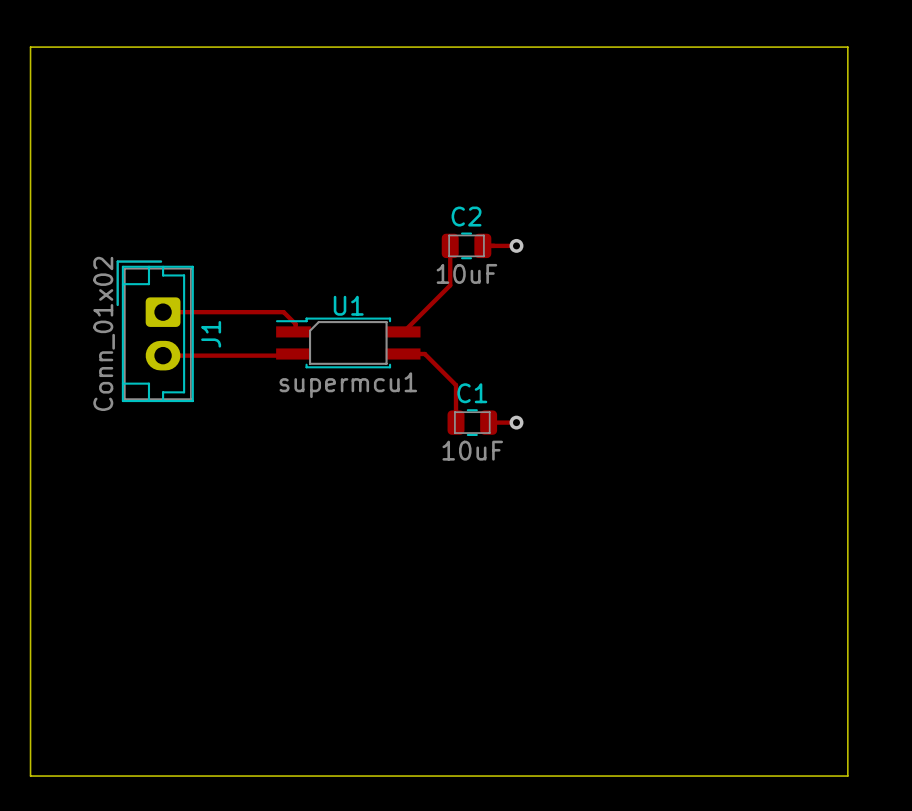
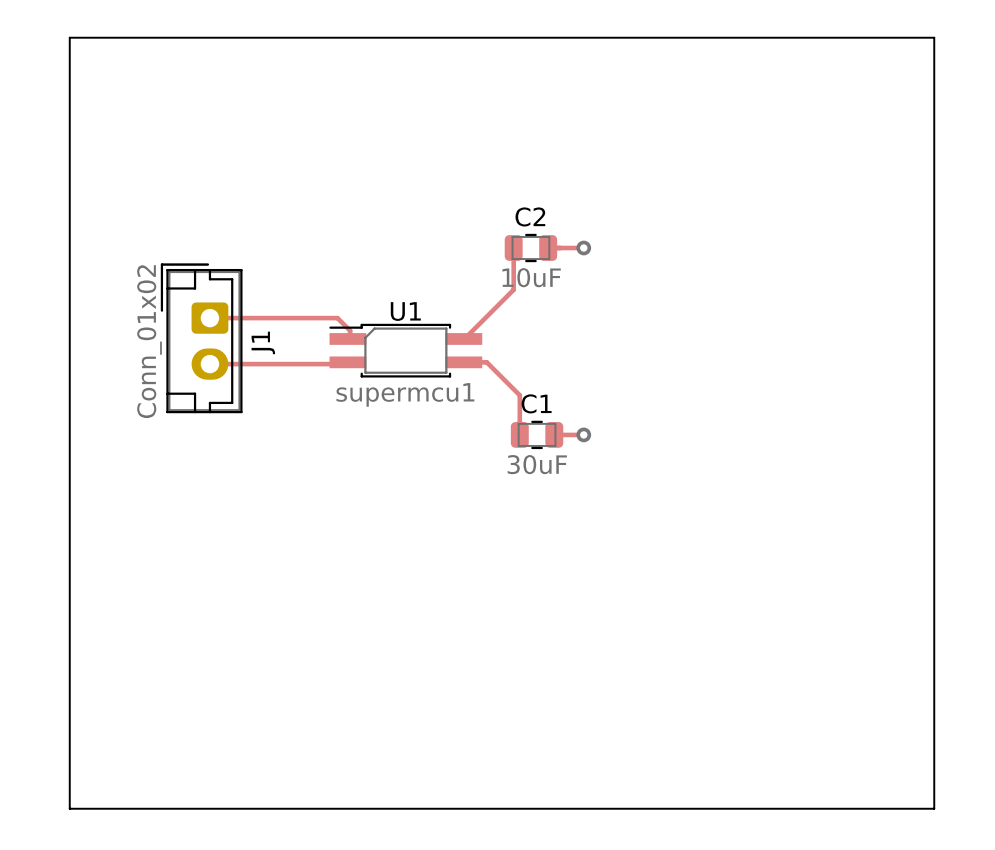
C1 value: 10uF (472, 450) -> 30uF (537, 464)

